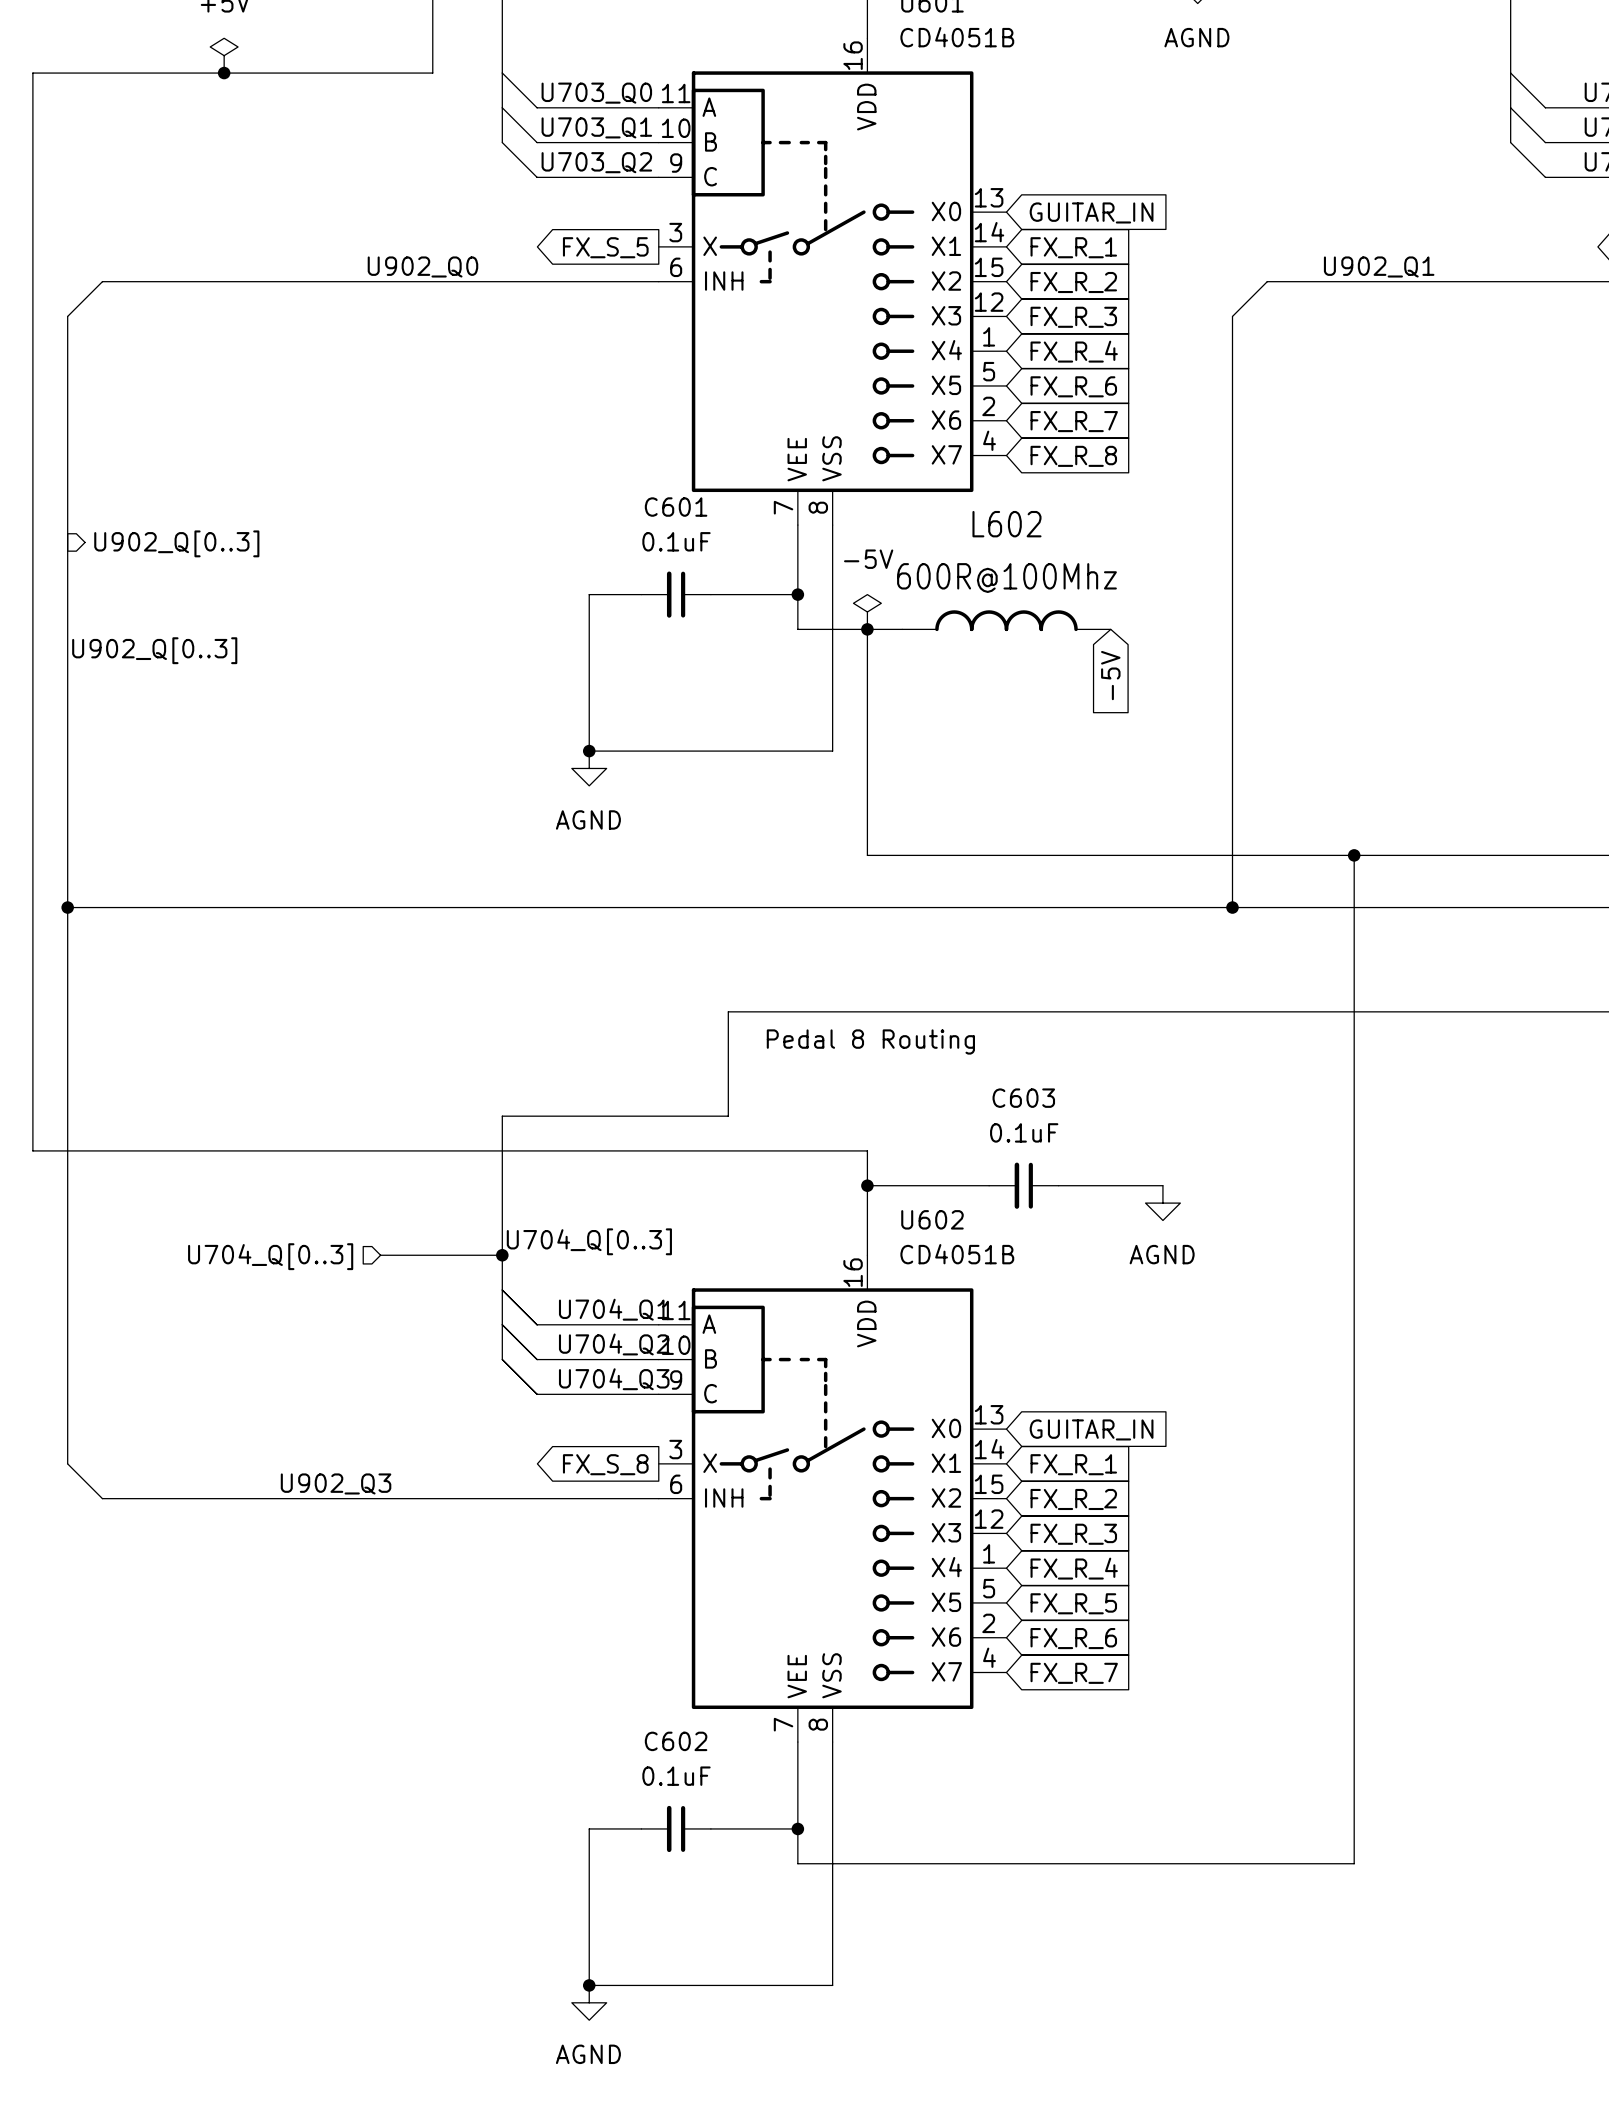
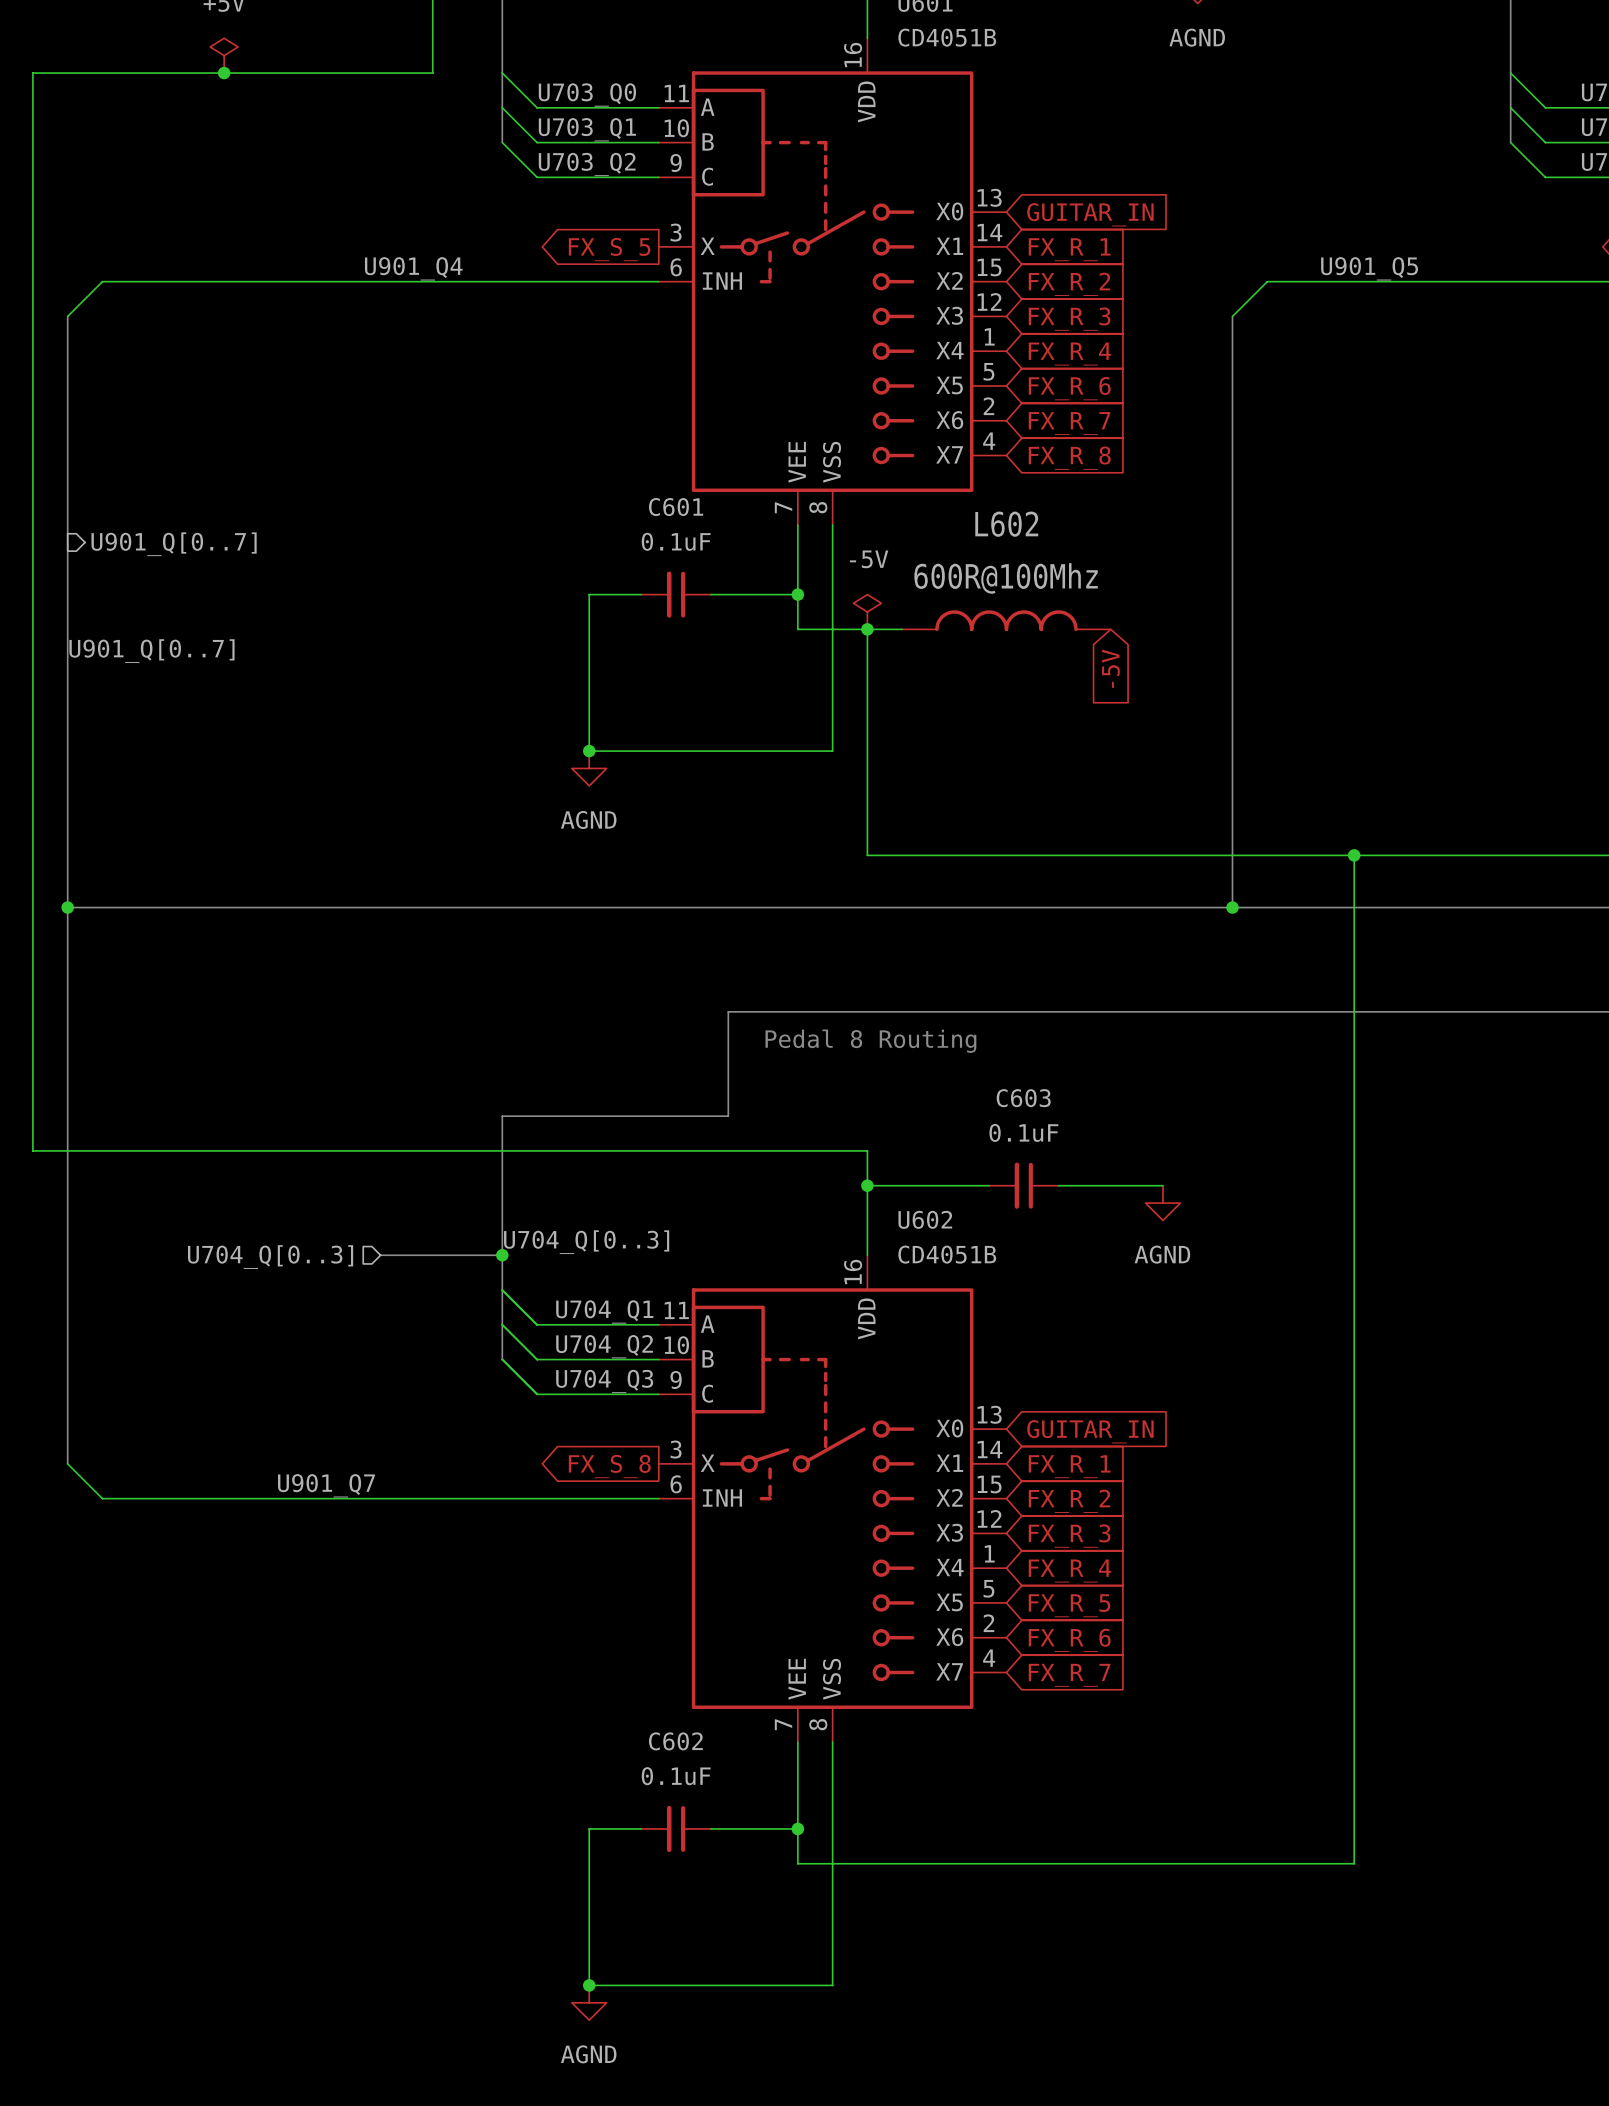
label: U902_Q0 (422, 266) -> U901_Q4 (413, 268)
label: U902_Q1 (1379, 266) -> U901_Q5 (1369, 268)
hierarchical label: U902_Q[0..3] (176, 543) -> U901_Q[0..7] (174, 544)
label: U902_Q[0..3] (154, 650) -> U901_Q[0..7] (151, 651)
label: U902_Q3 (336, 1483) -> U901_Q7 (326, 1485)

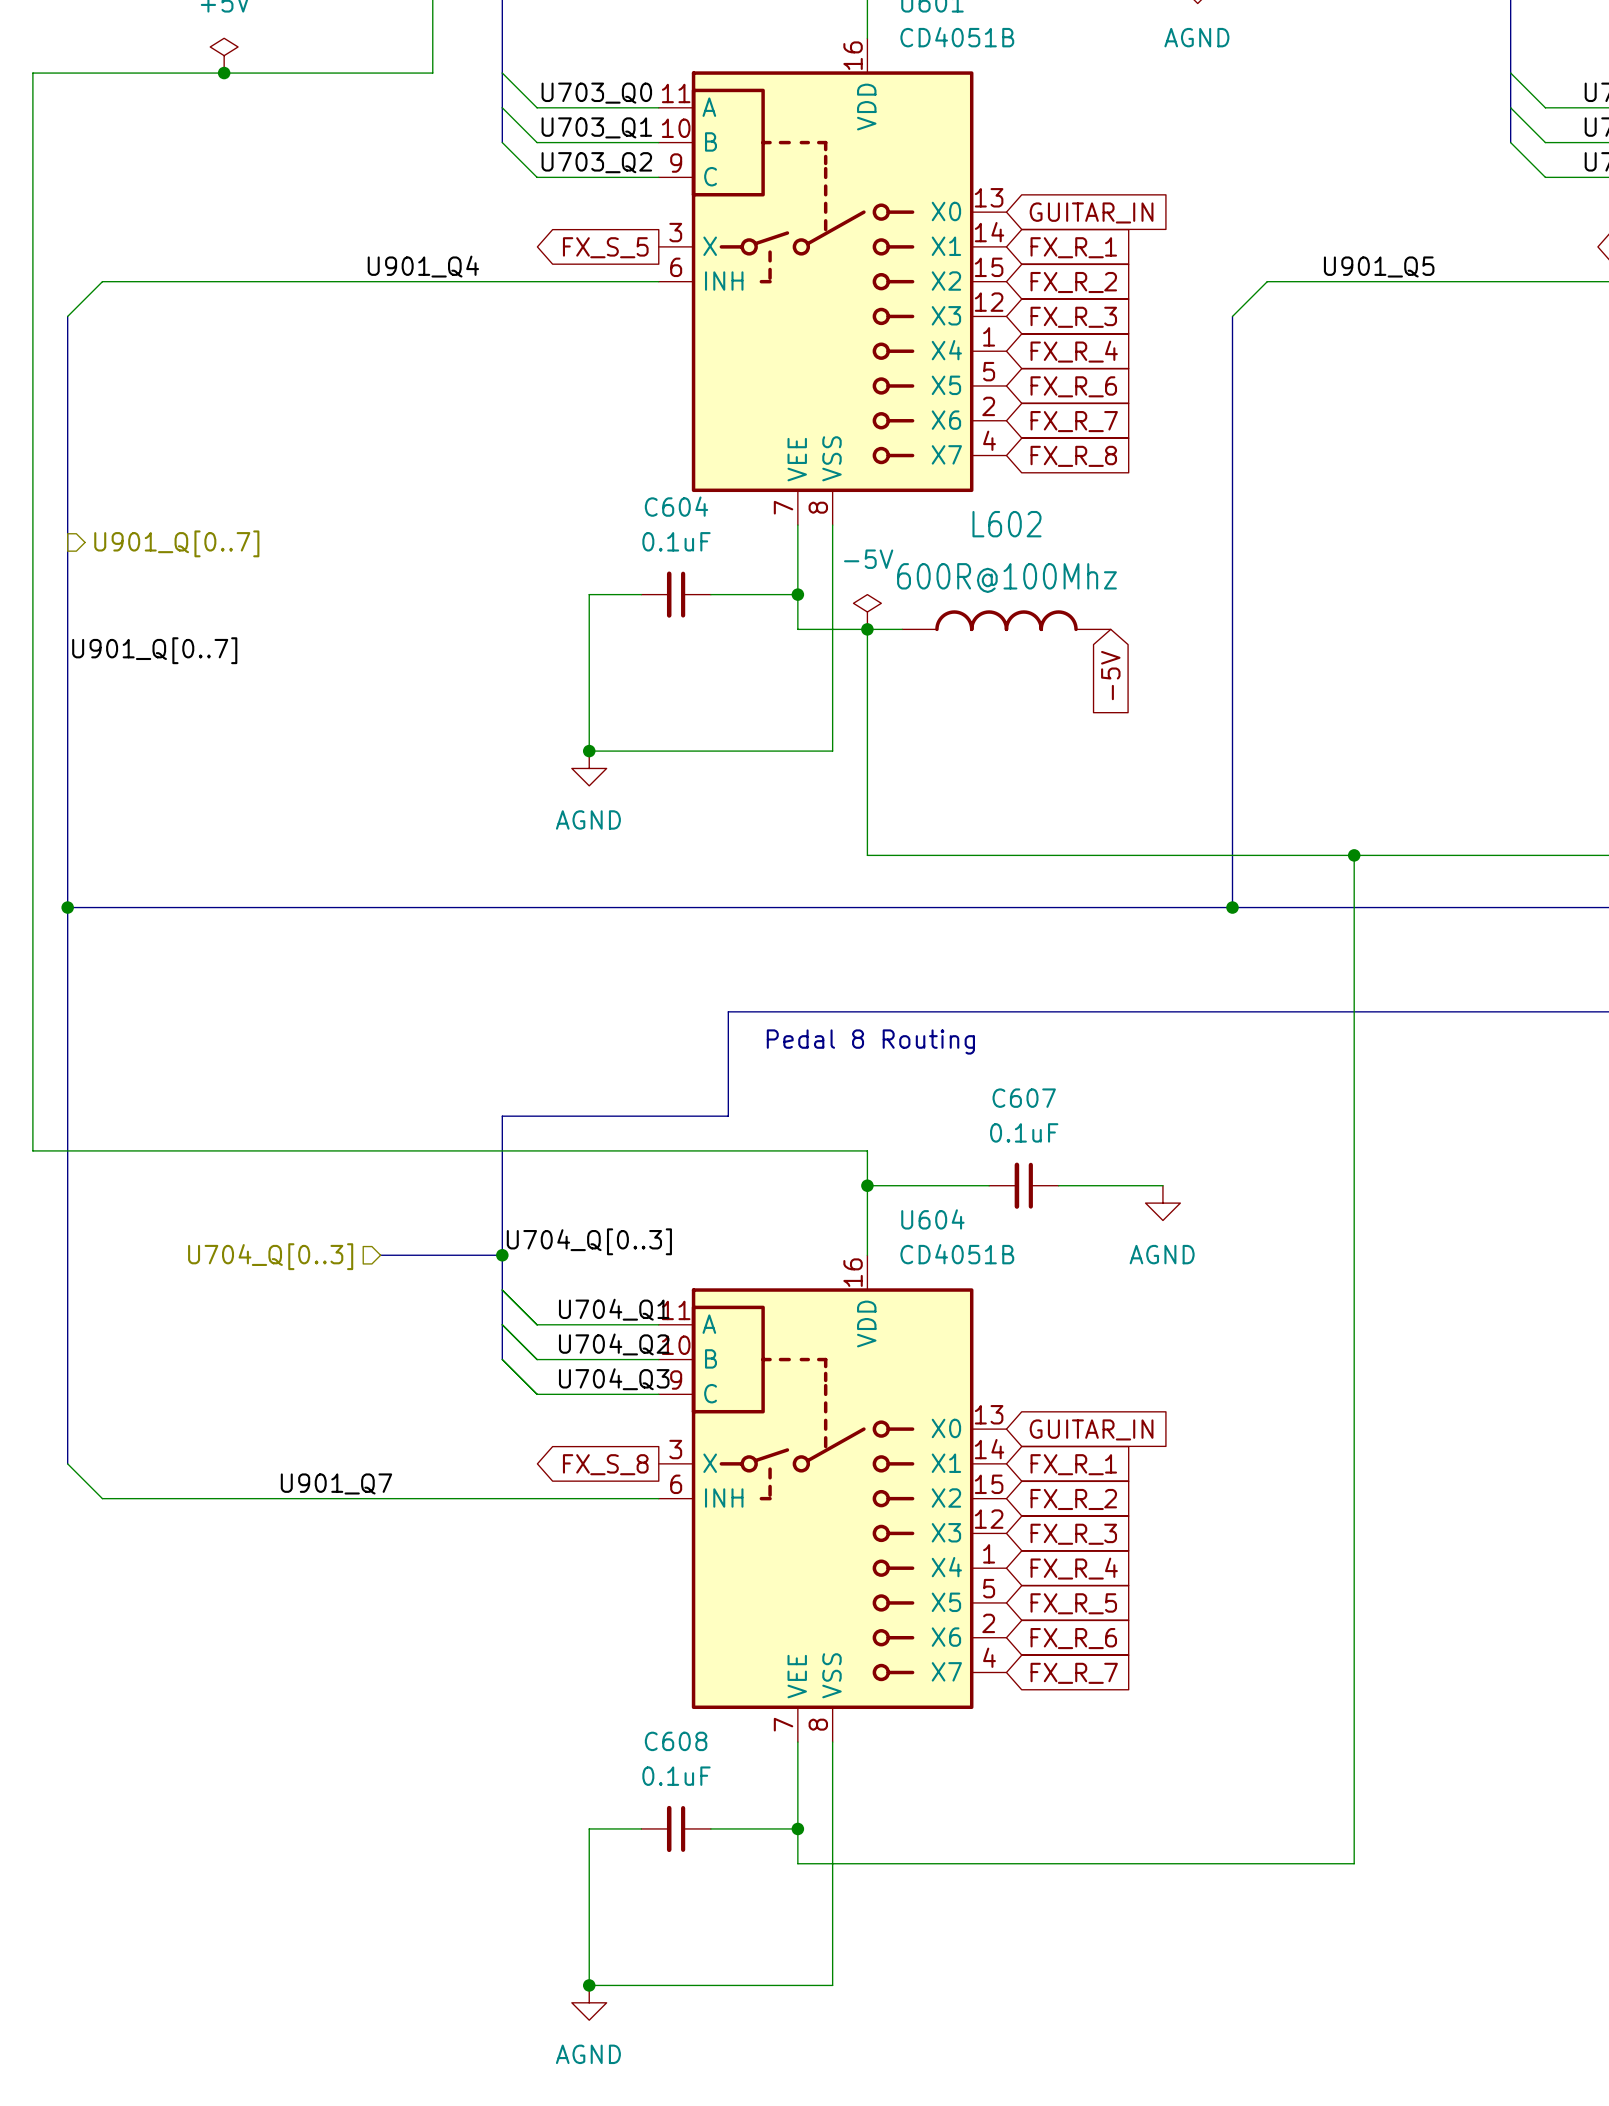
C601 name: C601 (676, 507) -> C604 (676, 506)
C603 name: C603 (1023, 1098) -> C607 (1024, 1098)
U602 name: U602 (925, 1219) -> U604 (932, 1219)
C602 name: C602 (675, 1741) -> C608 (676, 1741)

